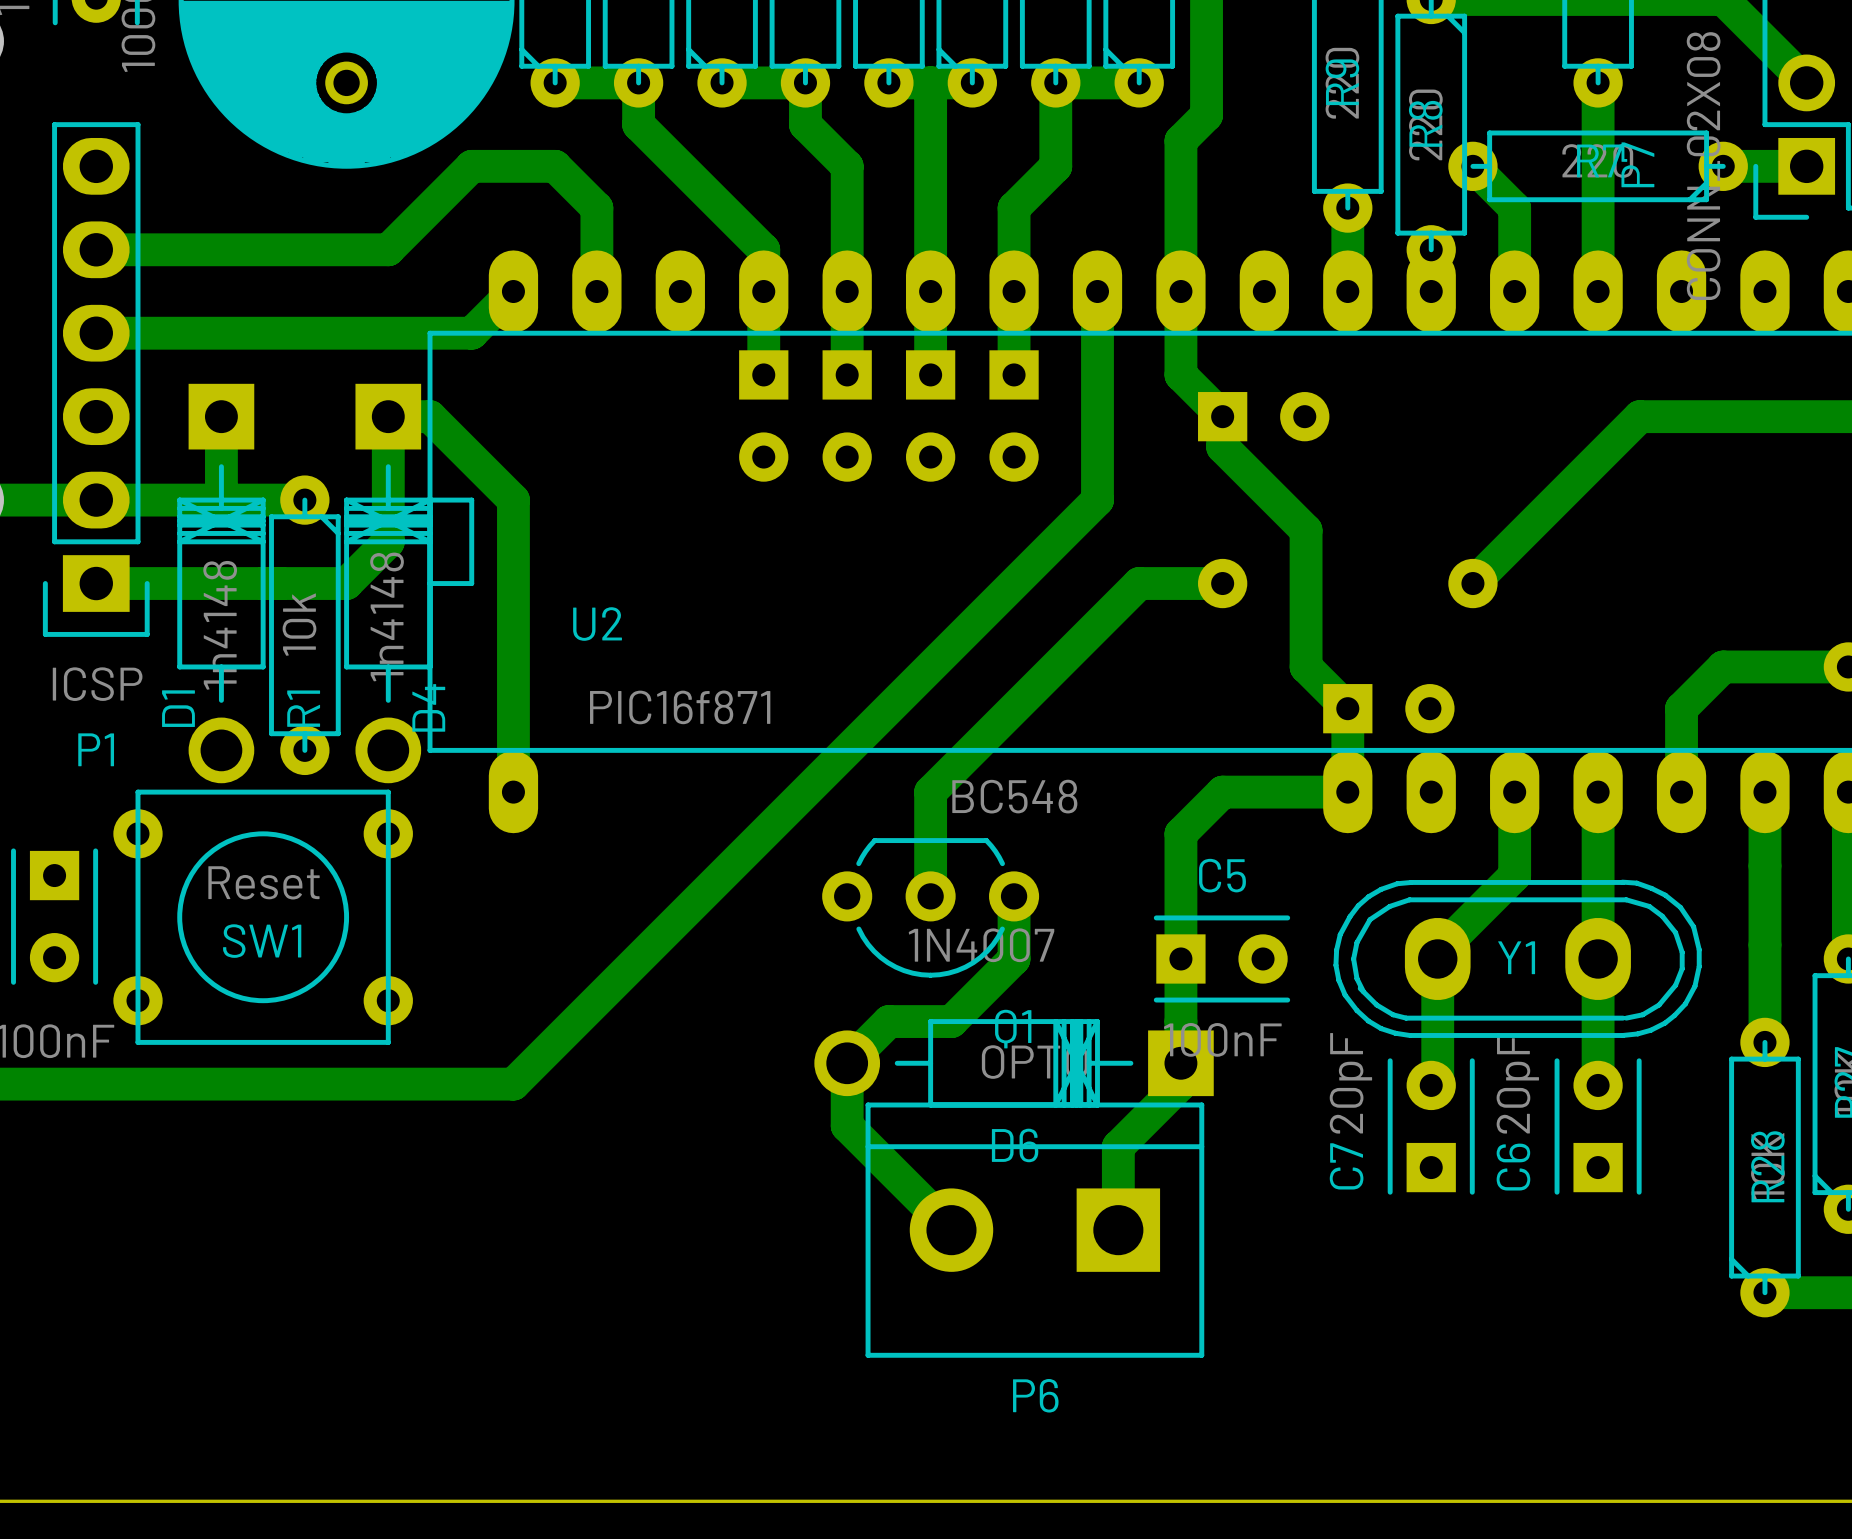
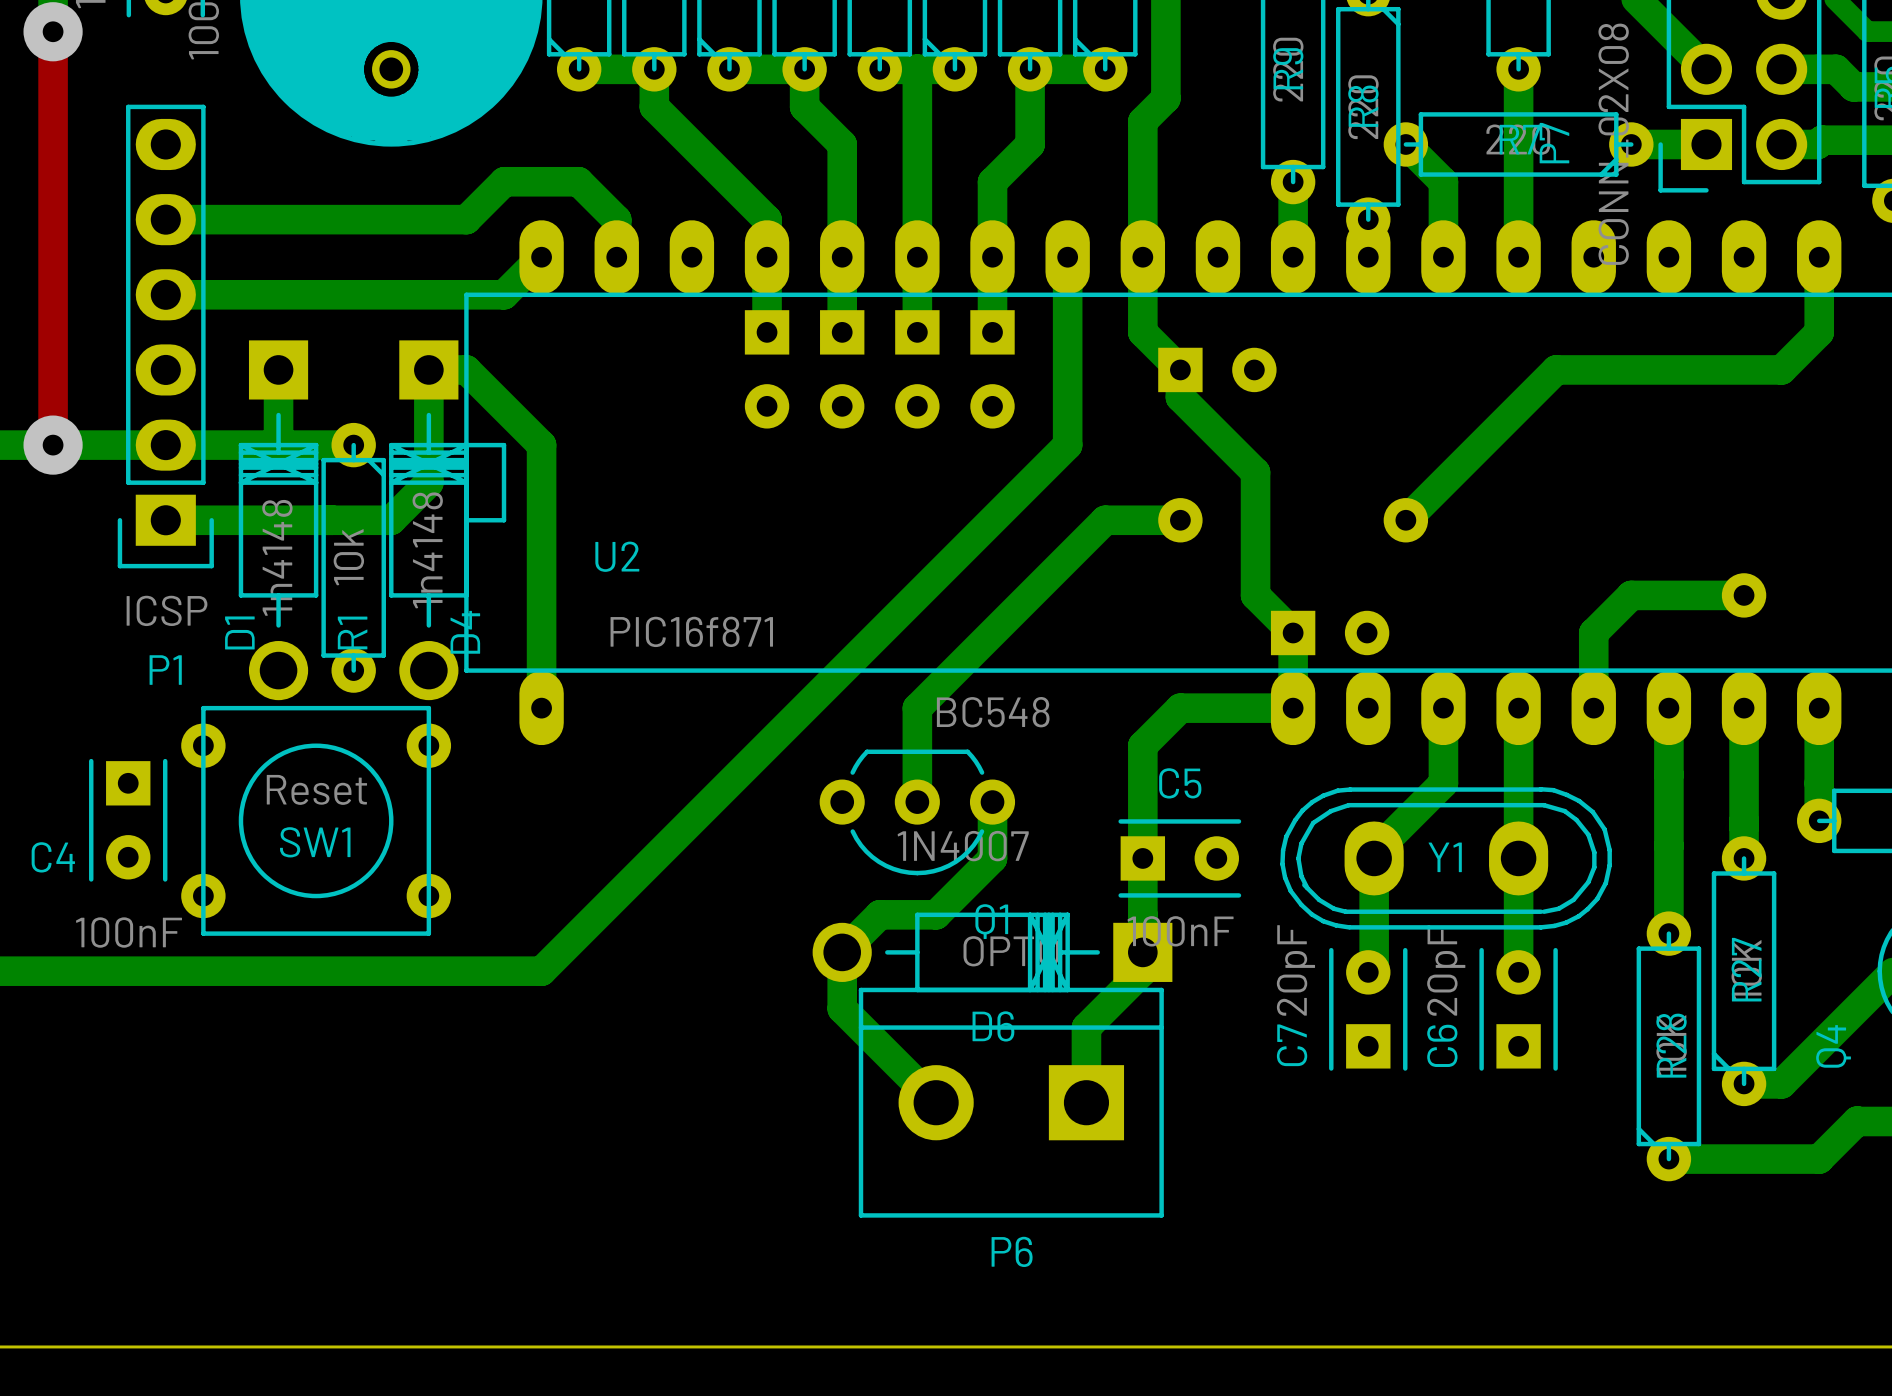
bottom track: (388, 249) (471, 166) (555, 166) (596, 208) (596, 249) -> (428, 219) (466, 219) (504, 181) (578, 181) (616, 219)

